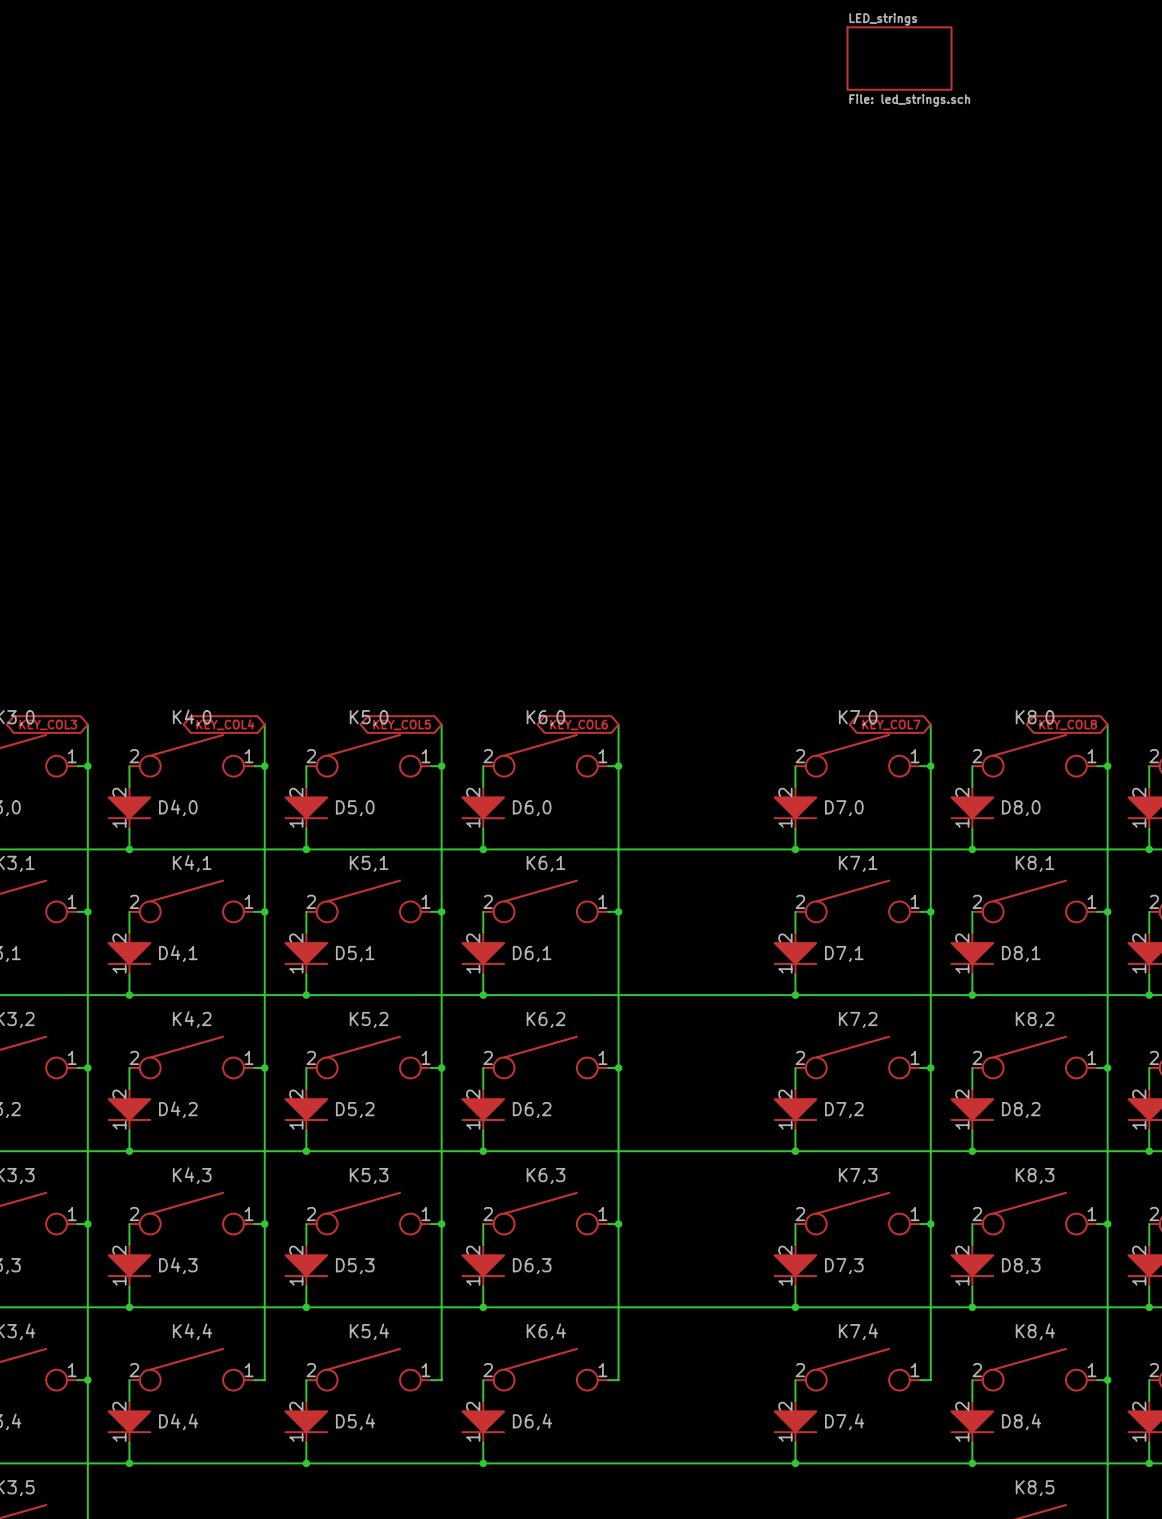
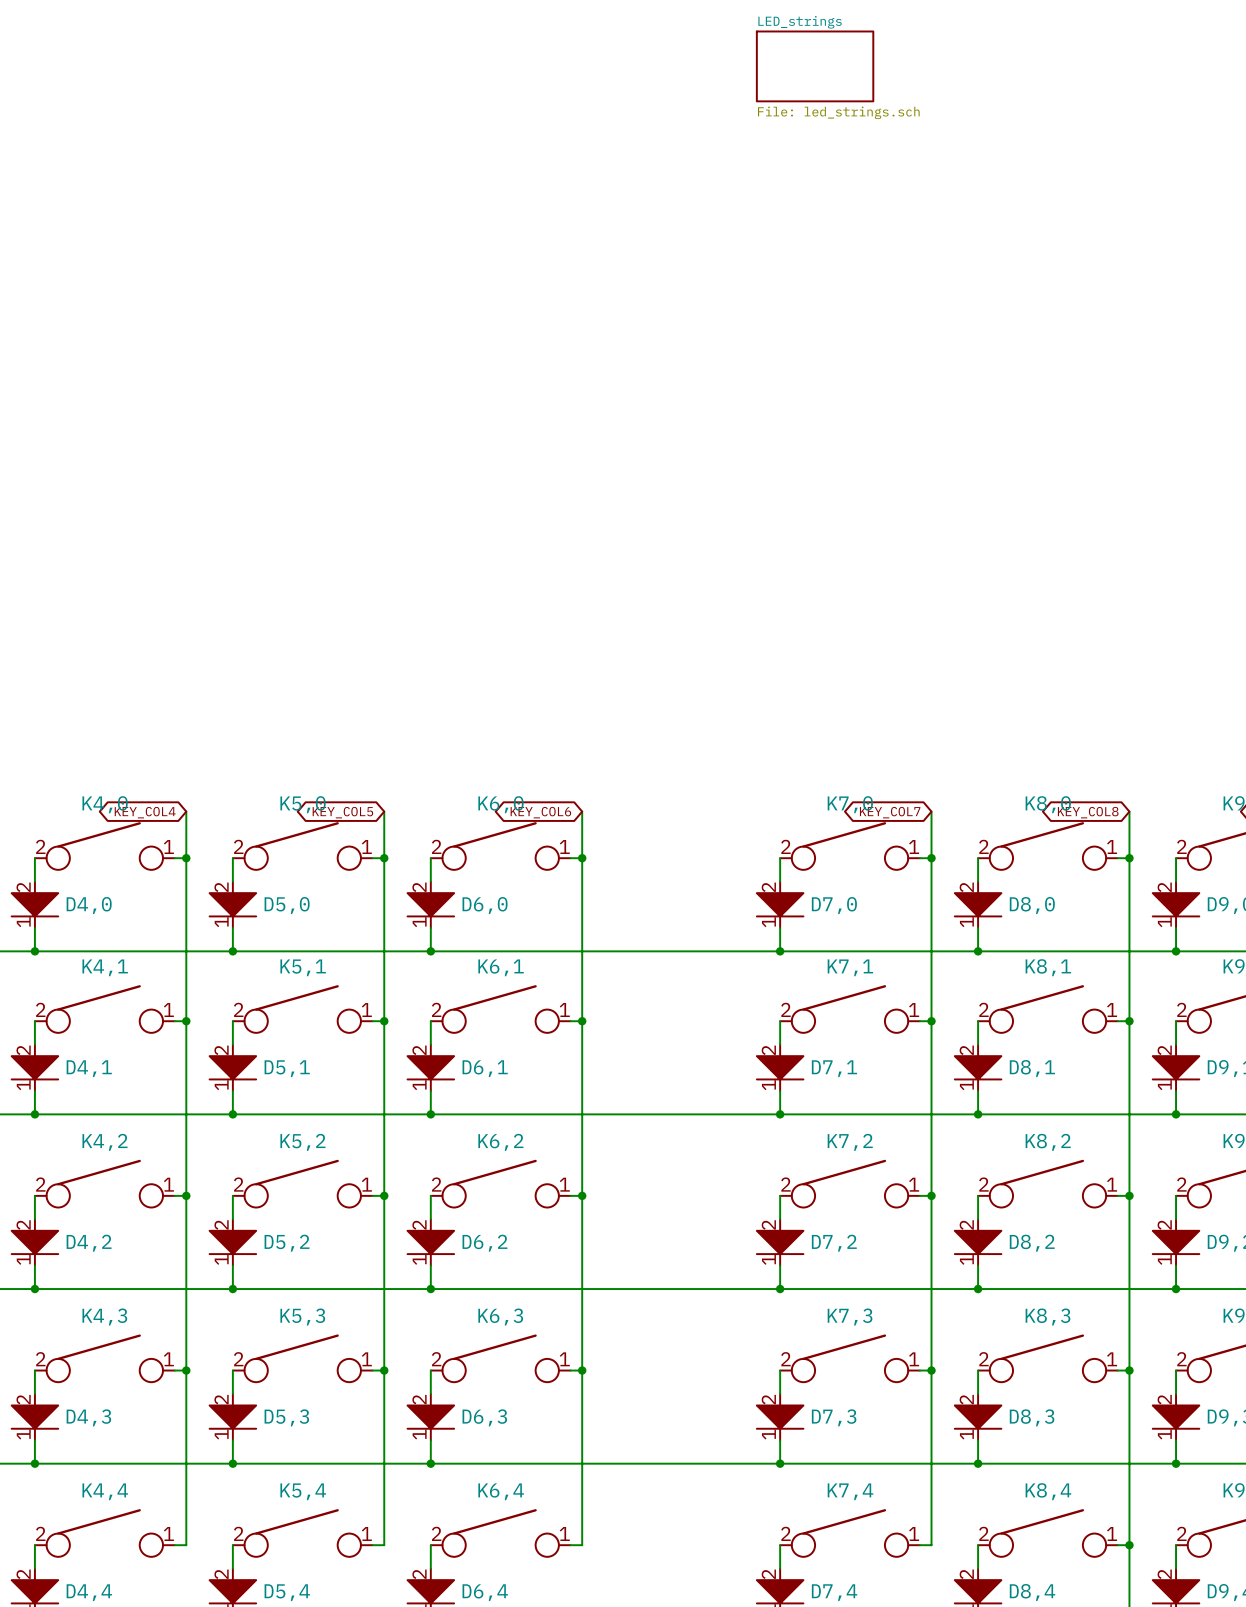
sheet LED_strings position: (899, 58) -> (815, 66)

